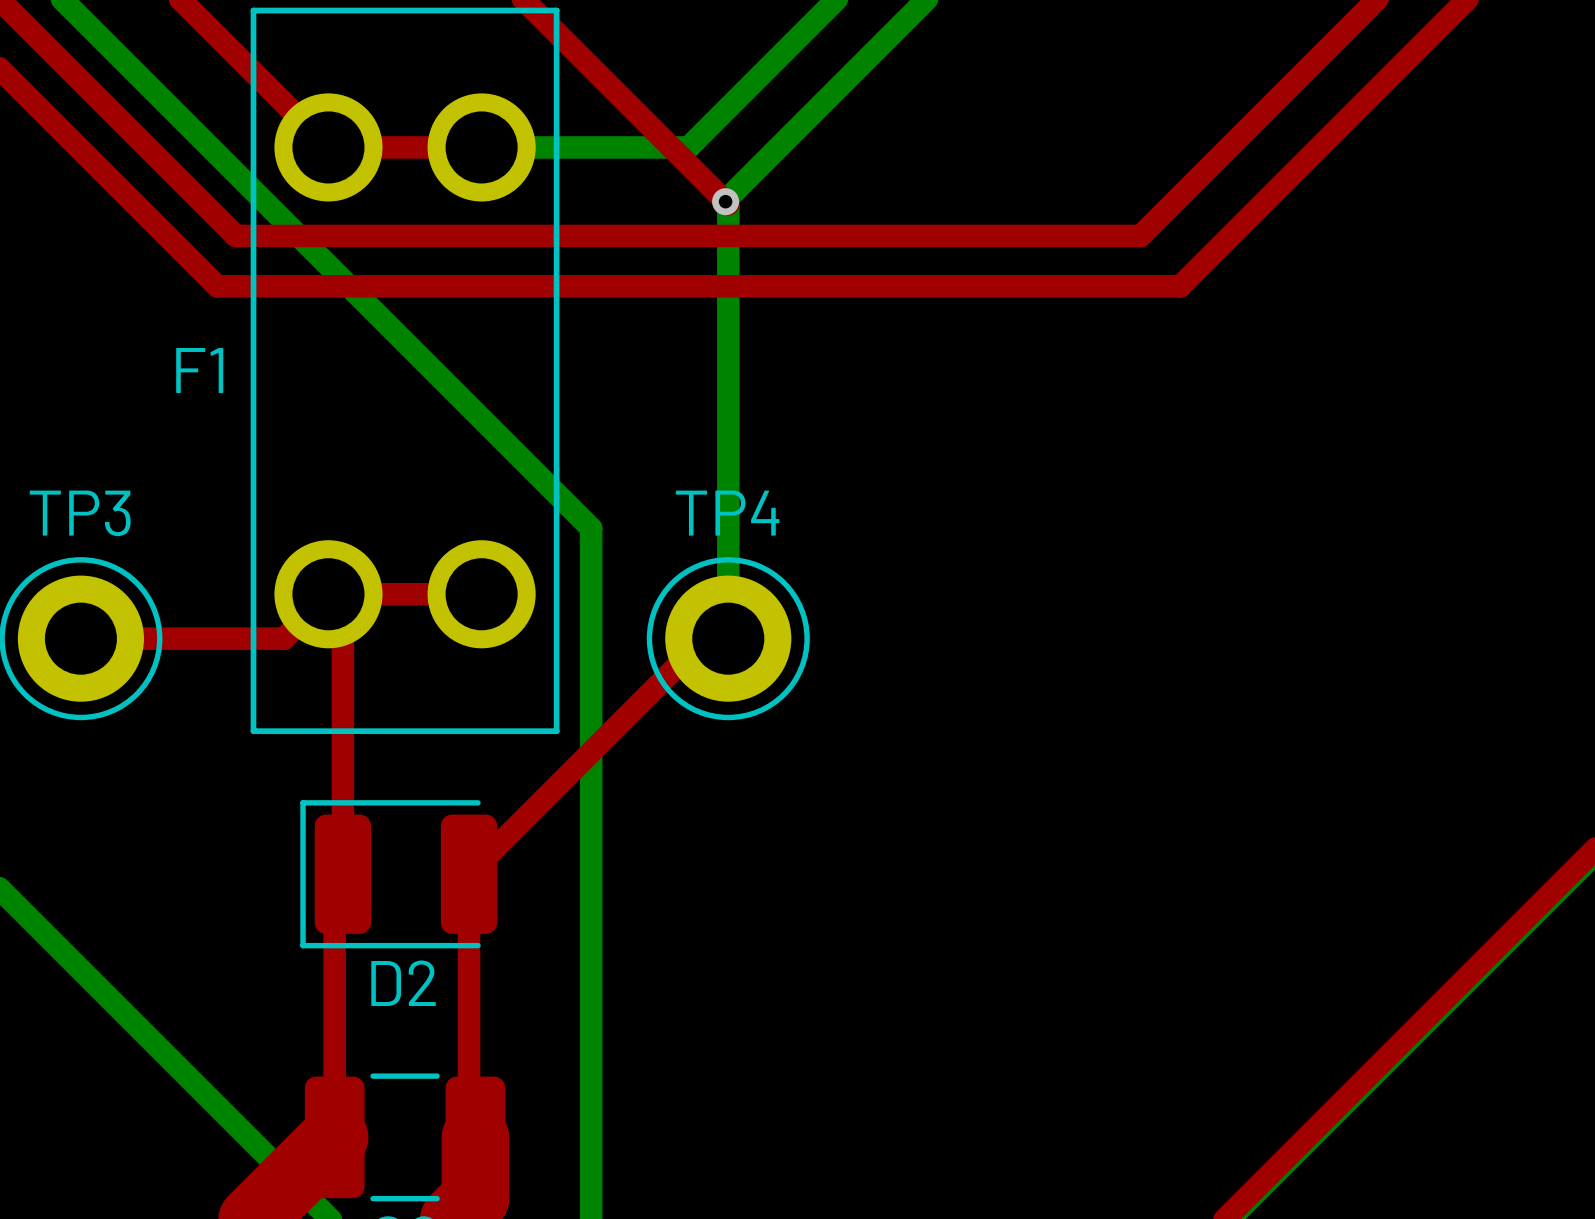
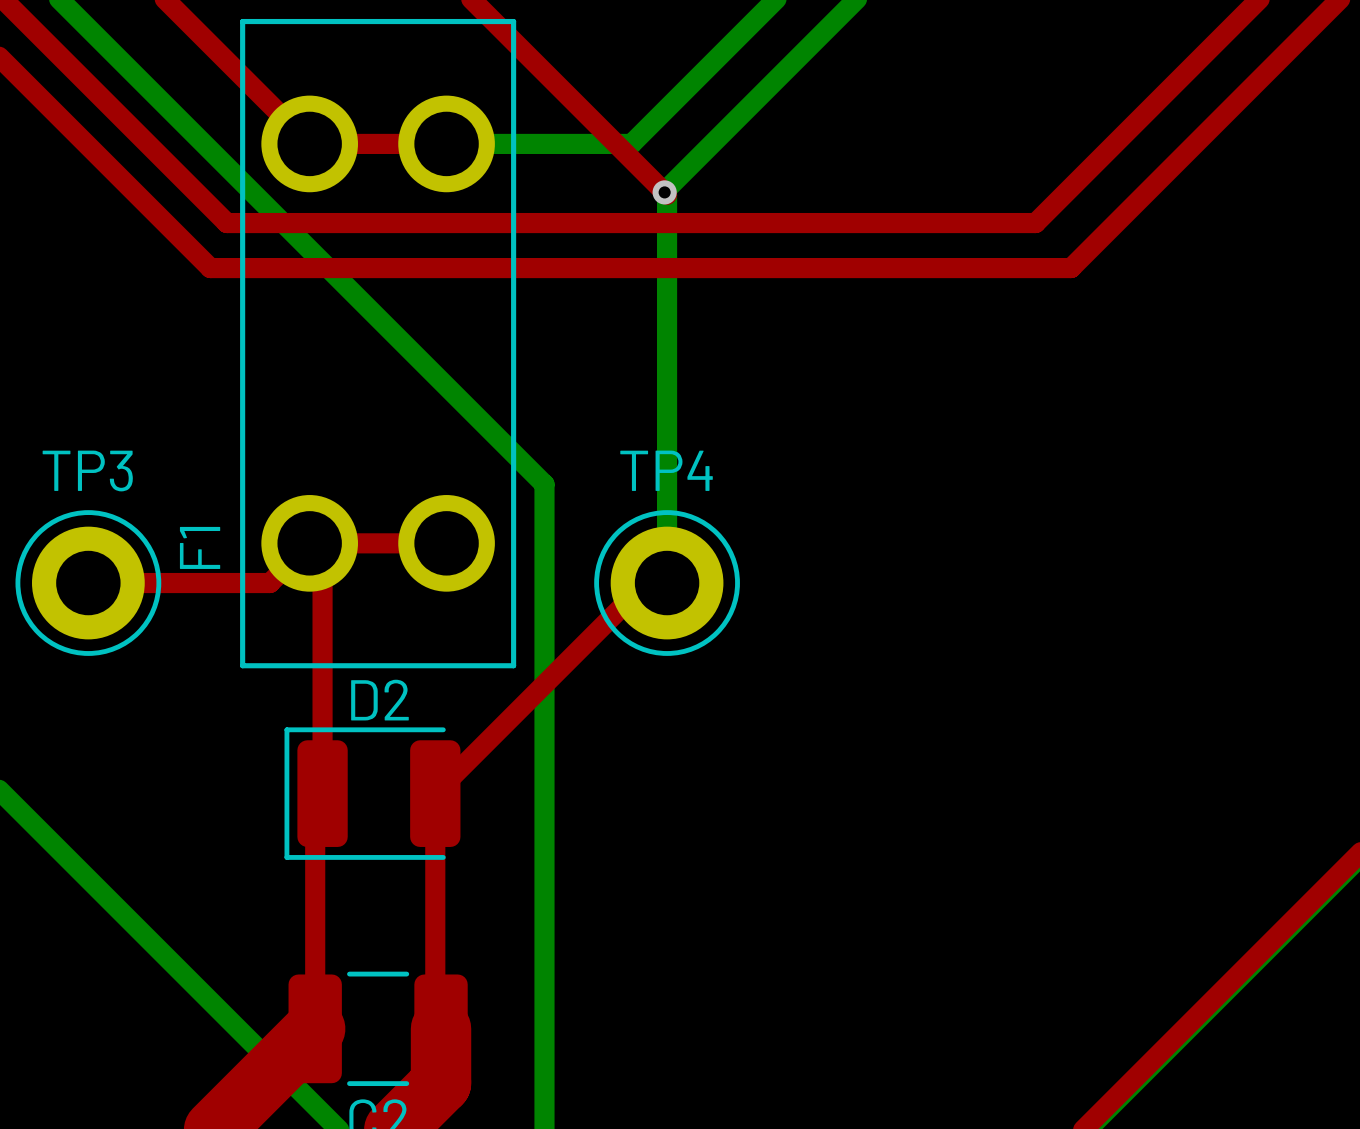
F1 name rotation: 0° (199, 370) -> 90° counterclockwise (200, 547)
F1 name position: F1 (199, 370) -> F1 (200, 547)
D2 name position: D2 (403, 983) -> D2 (379, 700)

